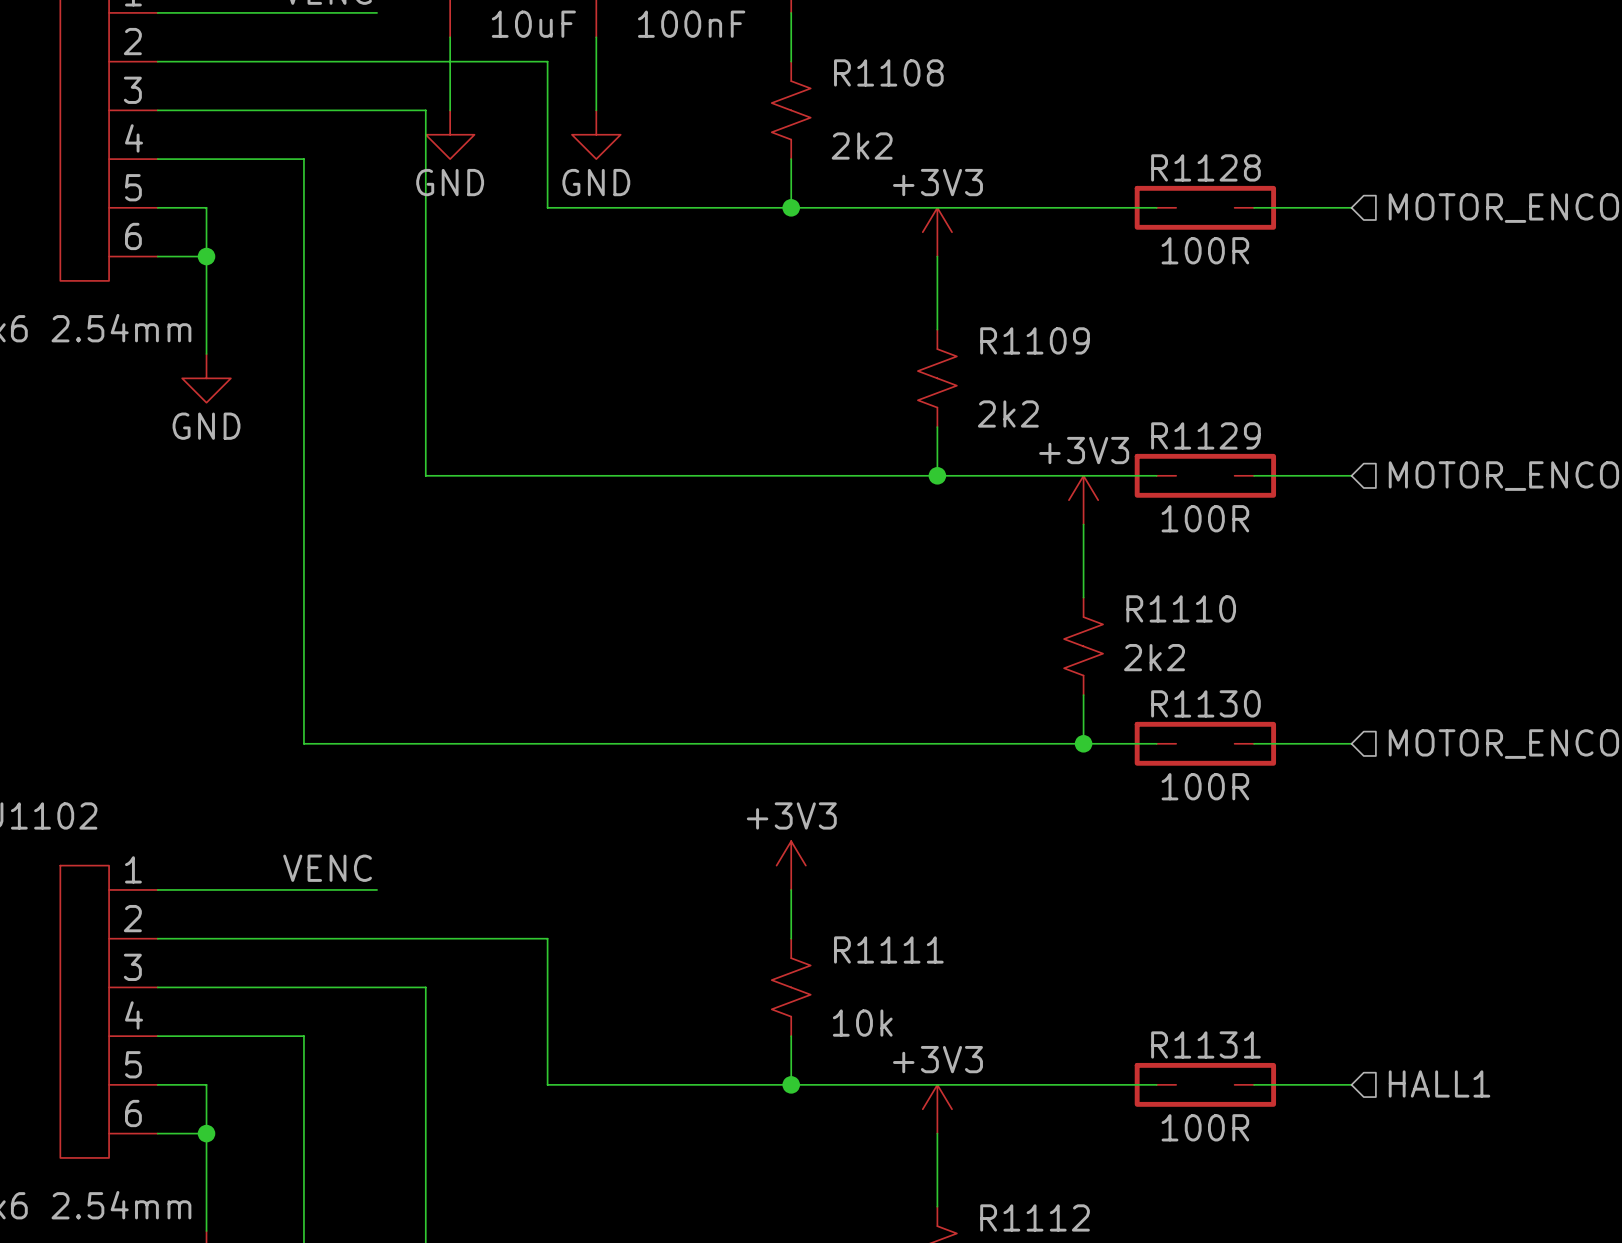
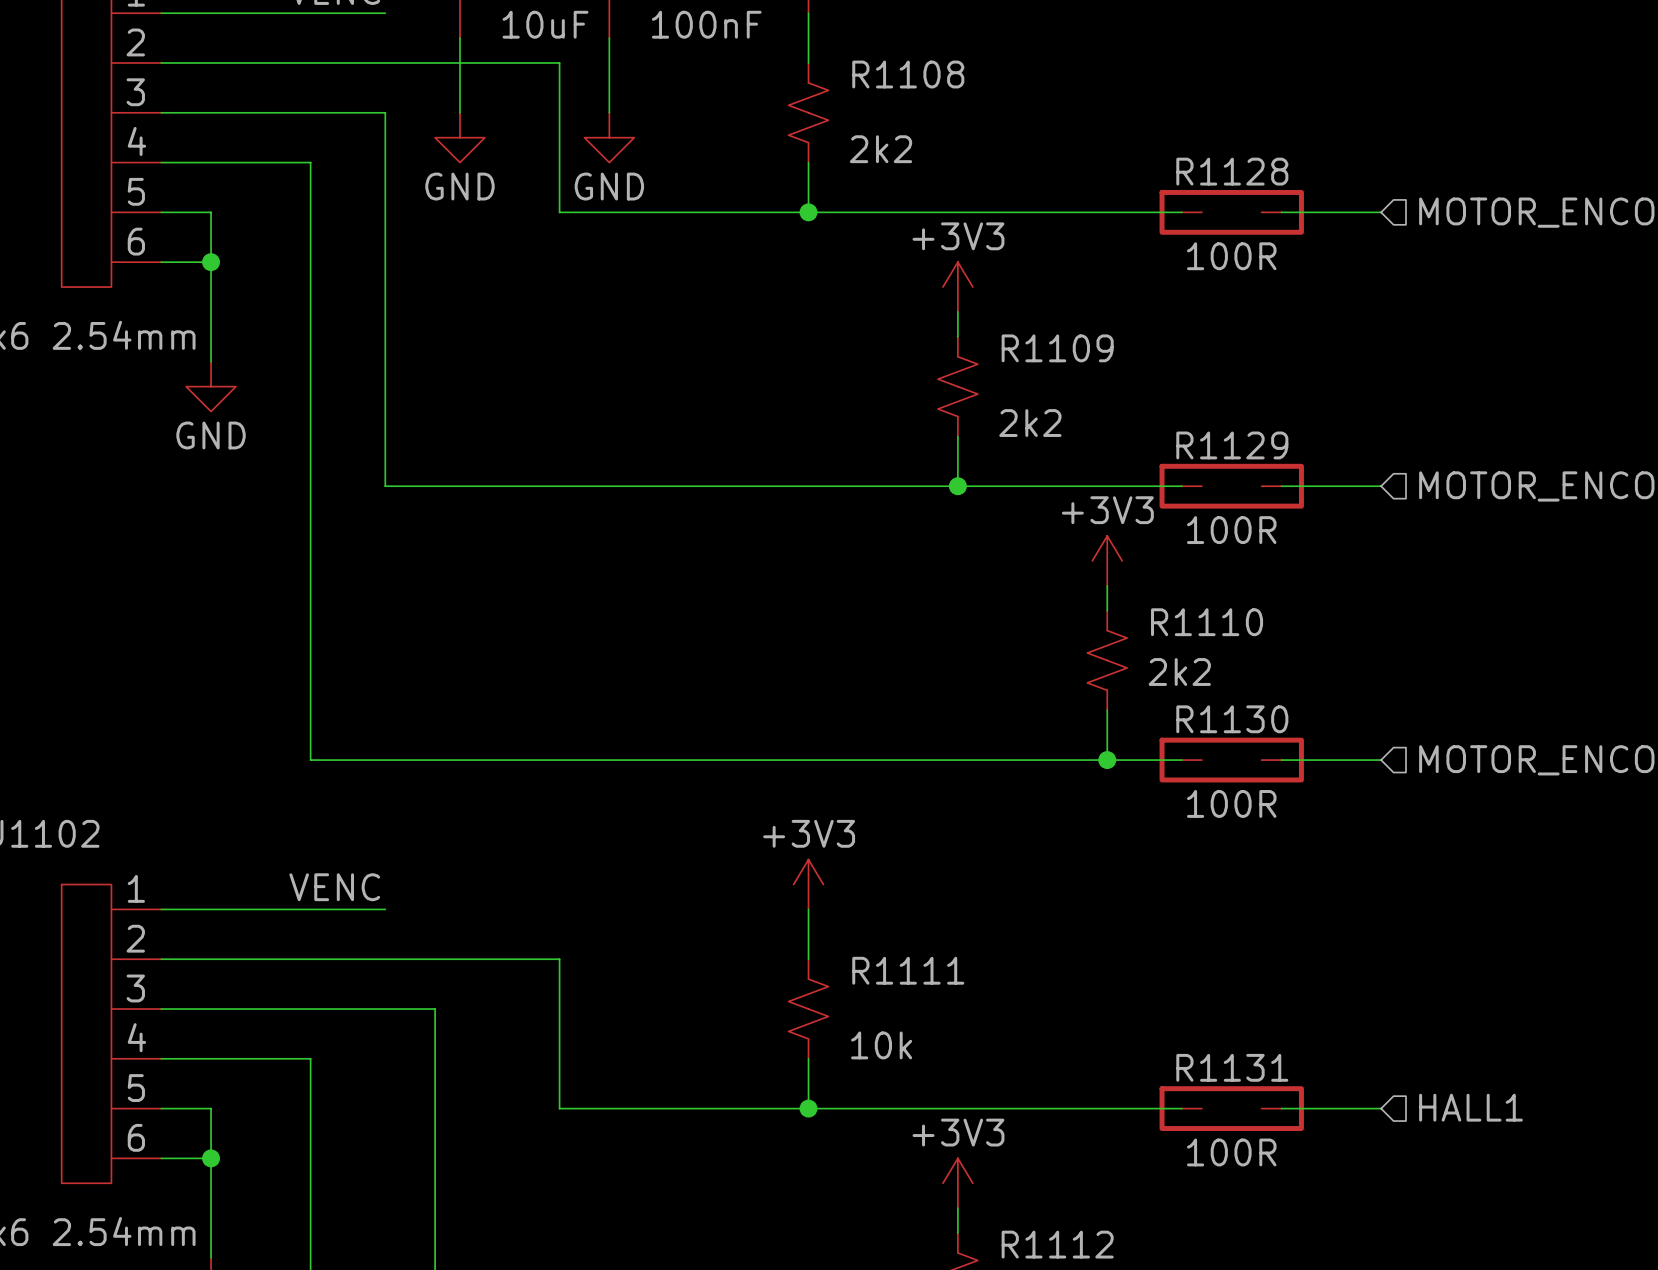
wire: (377, 110) (425, 110) (425, 475) -> (385, 112) (385, 486) (435, 486)
power symbol position: +3V3 (937, 232) -> +3V3 (957, 287)
power symbol position: +3V3 (1083, 500) -> +3V3 (1107, 560)
power symbol position: +3V3 (937, 1109) -> +3V3 (957, 1183)

